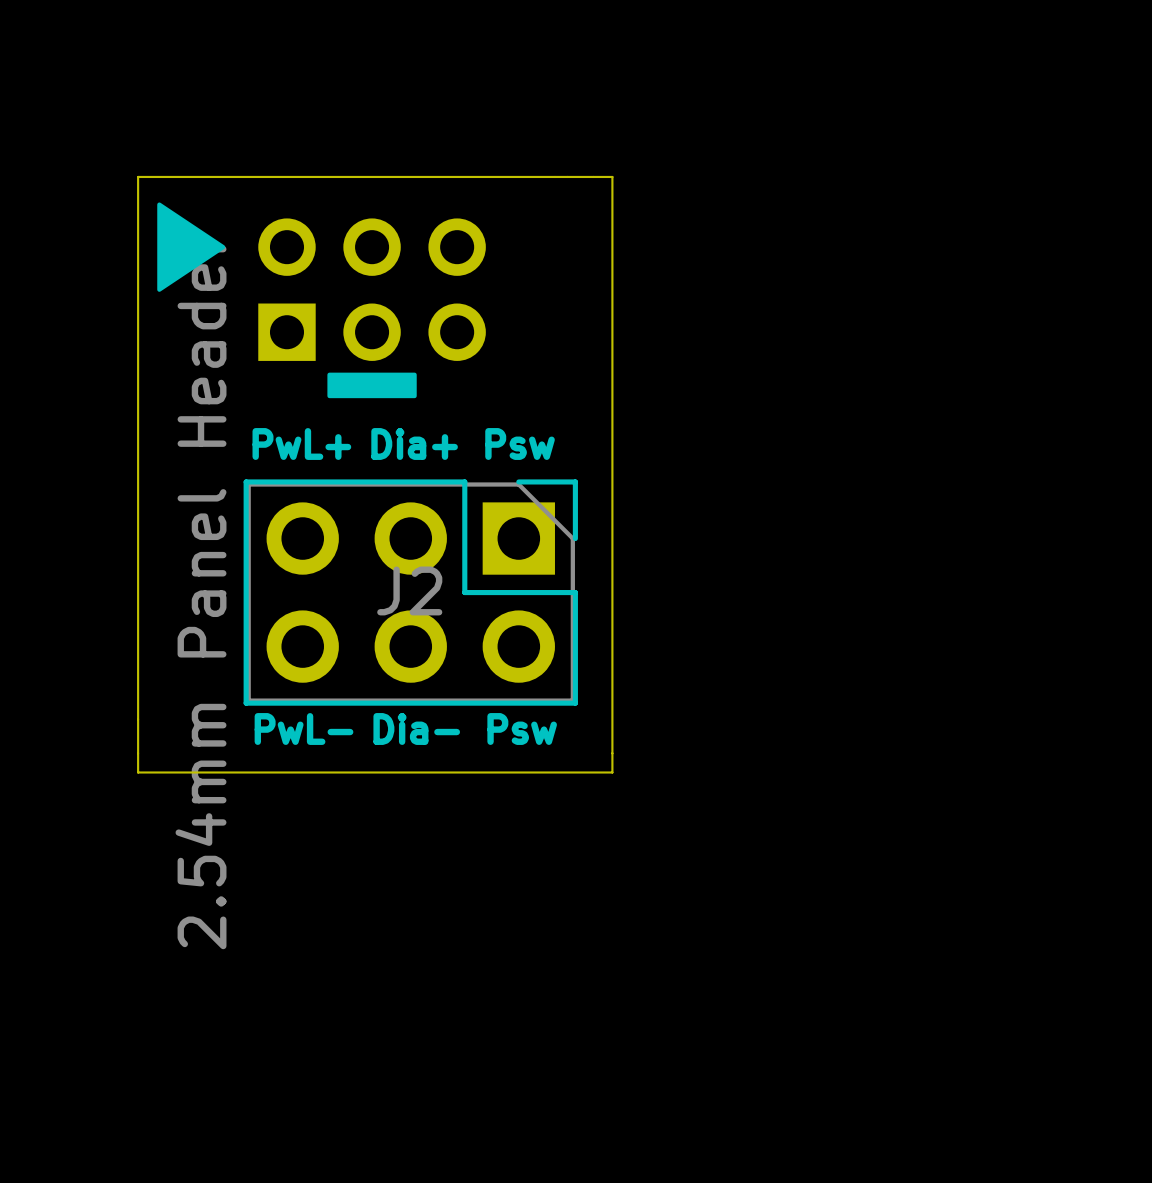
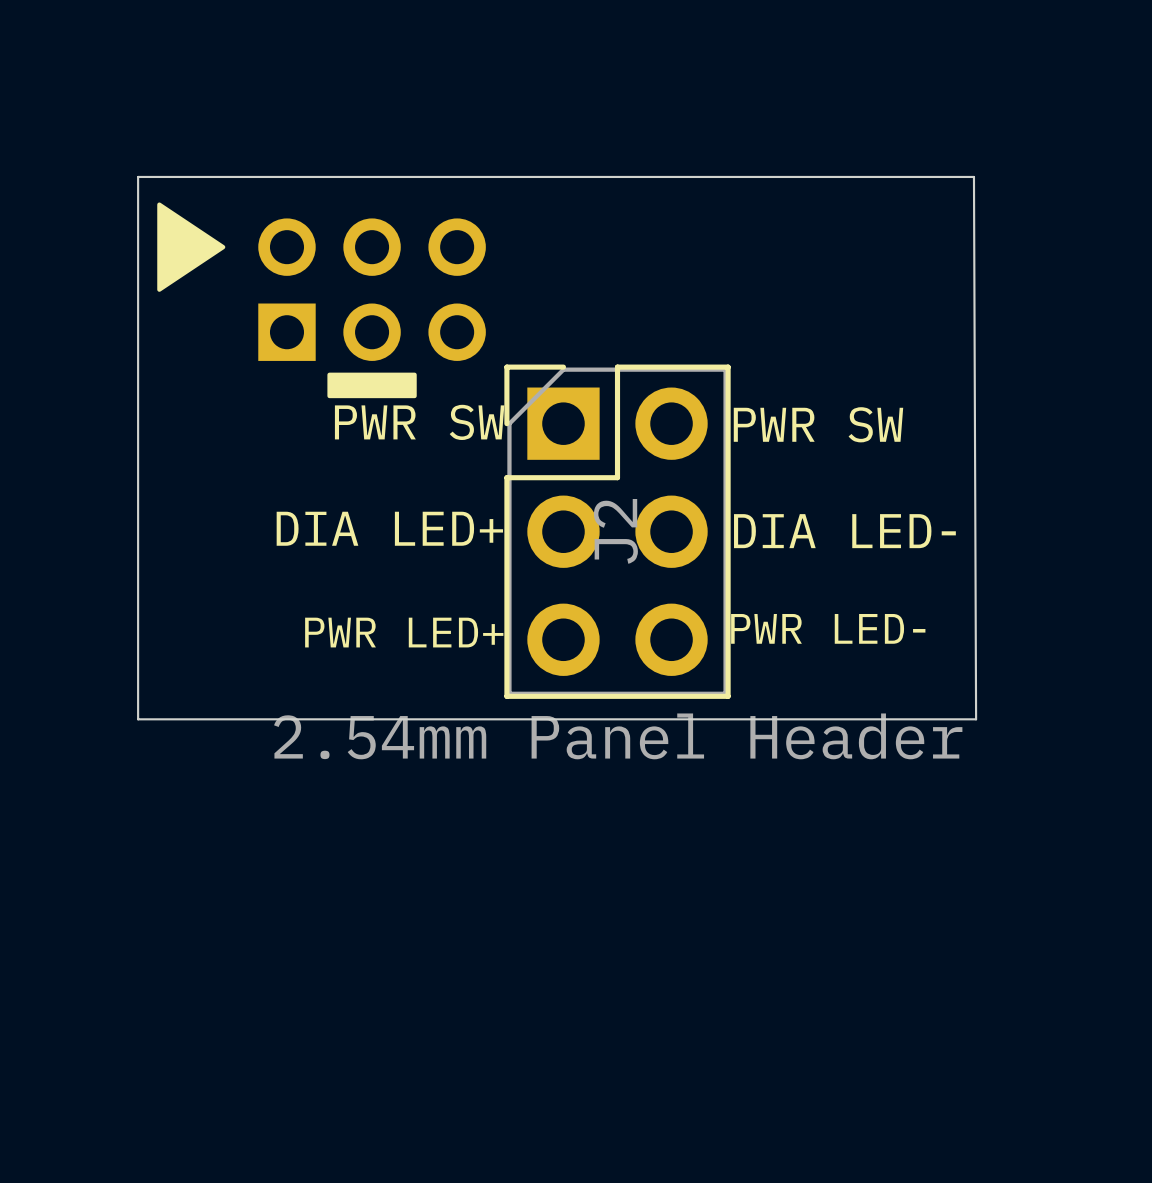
board edge: (612, 176) (612, 772) (138, 772) (138, 719) -> (612, 176) (973, 176) (976, 719) (138, 719)
text: none -> PWR SW (818, 424)
text: PwL+ (301, 443) -> none
text: Dia+ (414, 443) -> none
text: Psw (520, 443) -> PWR SW (419, 422)
text: none -> DIA LED+ (389, 528)
text: none -> DIA LED- (844, 531)
J2 rotation: 0° (410, 592) -> 90° counterclockwise (617, 531)
J2 position: (410, 592) -> (617, 531)
text: none -> PWR LED- (828, 628)
text: none -> PWR LED+ (404, 632)
text: PwL- (304, 729) -> none
text: Dia- (416, 729) -> none
text: Psw (522, 729) -> none

